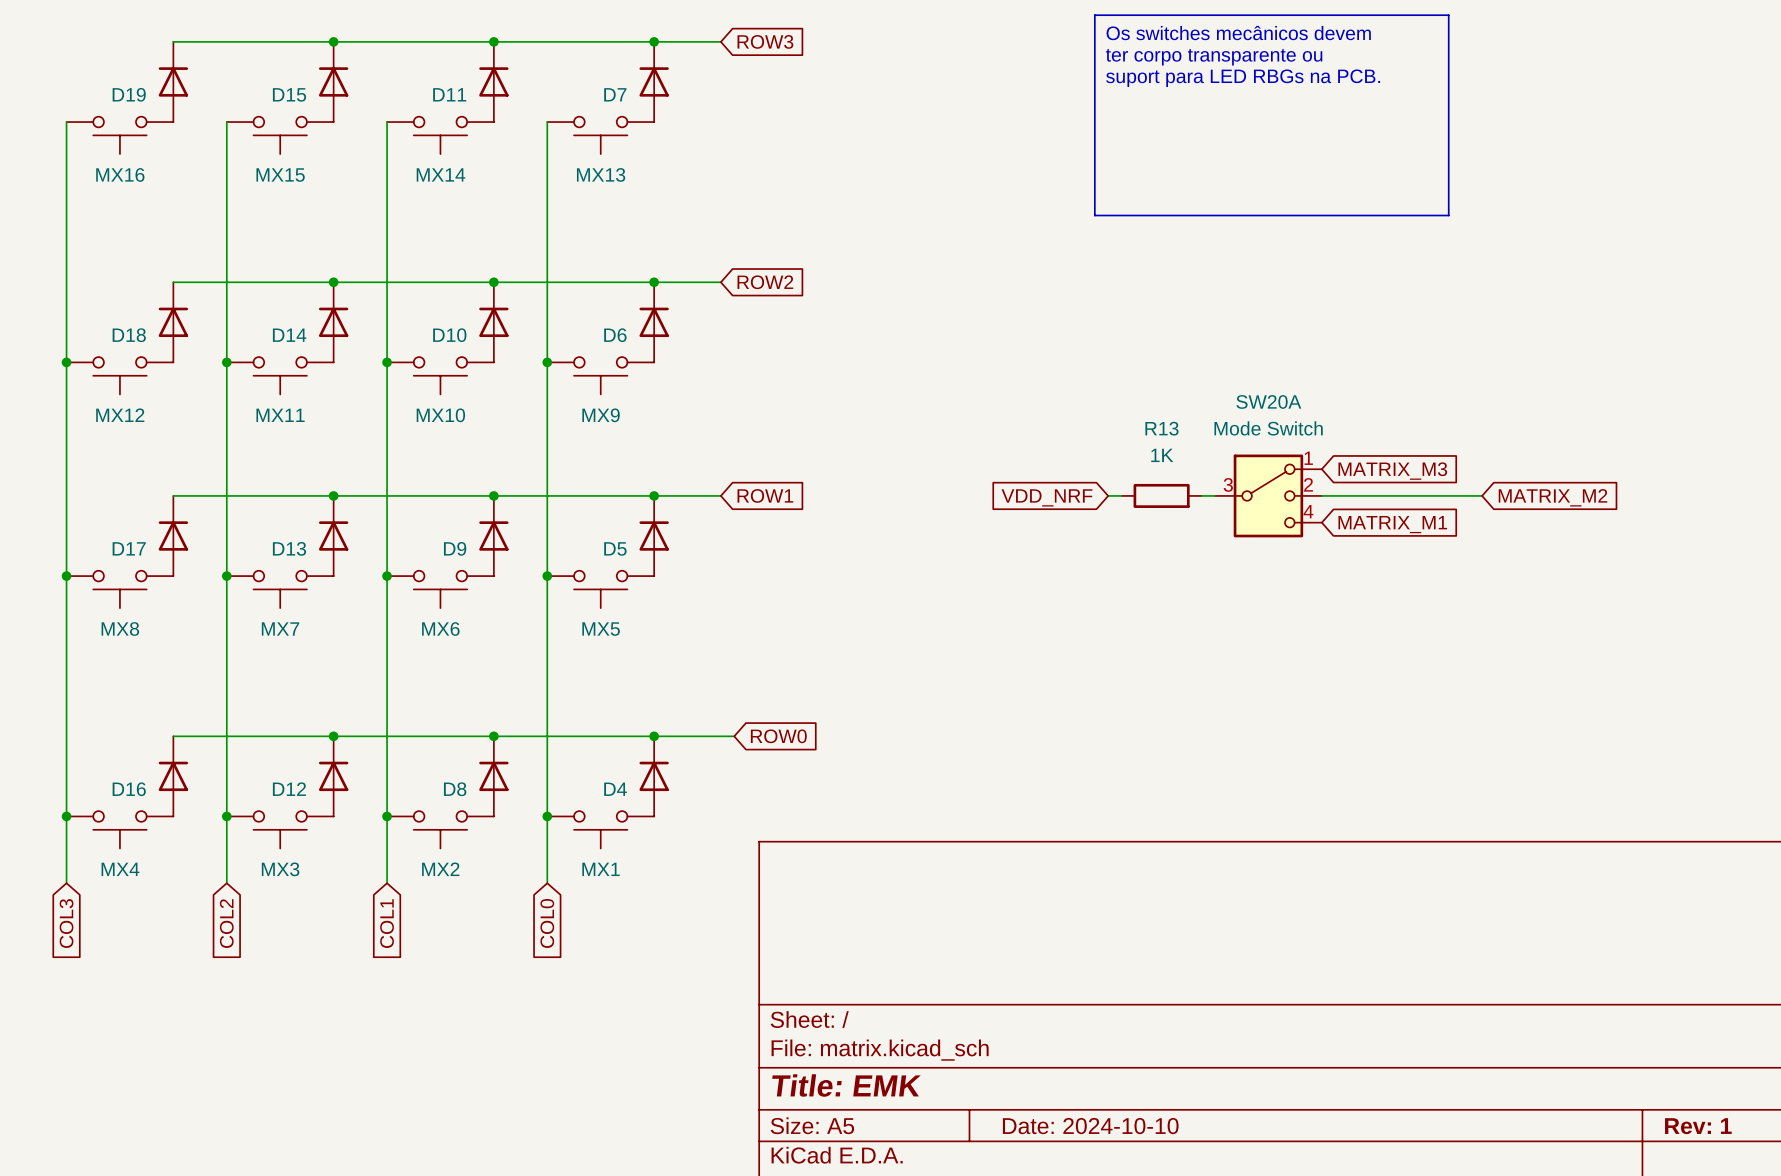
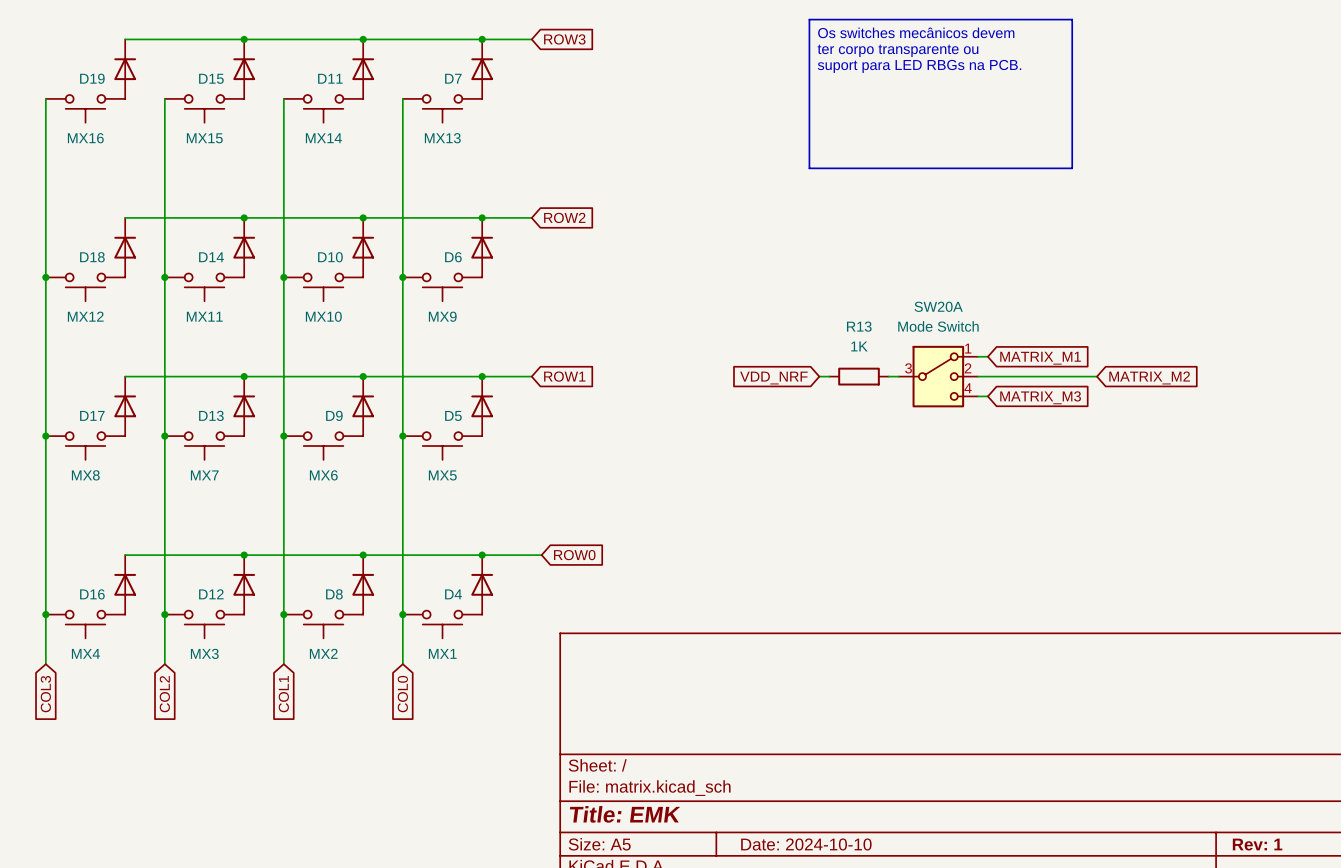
wire: none -> (978, 356) (987, 356)
global label position: MATRIX_M3 (1392, 471) -> MATRIX_M3 (1040, 397)
wire: none -> (978, 396) (987, 396)
global label position: MATRIX_M1 (1392, 524) -> MATRIX_M1 (1040, 358)

